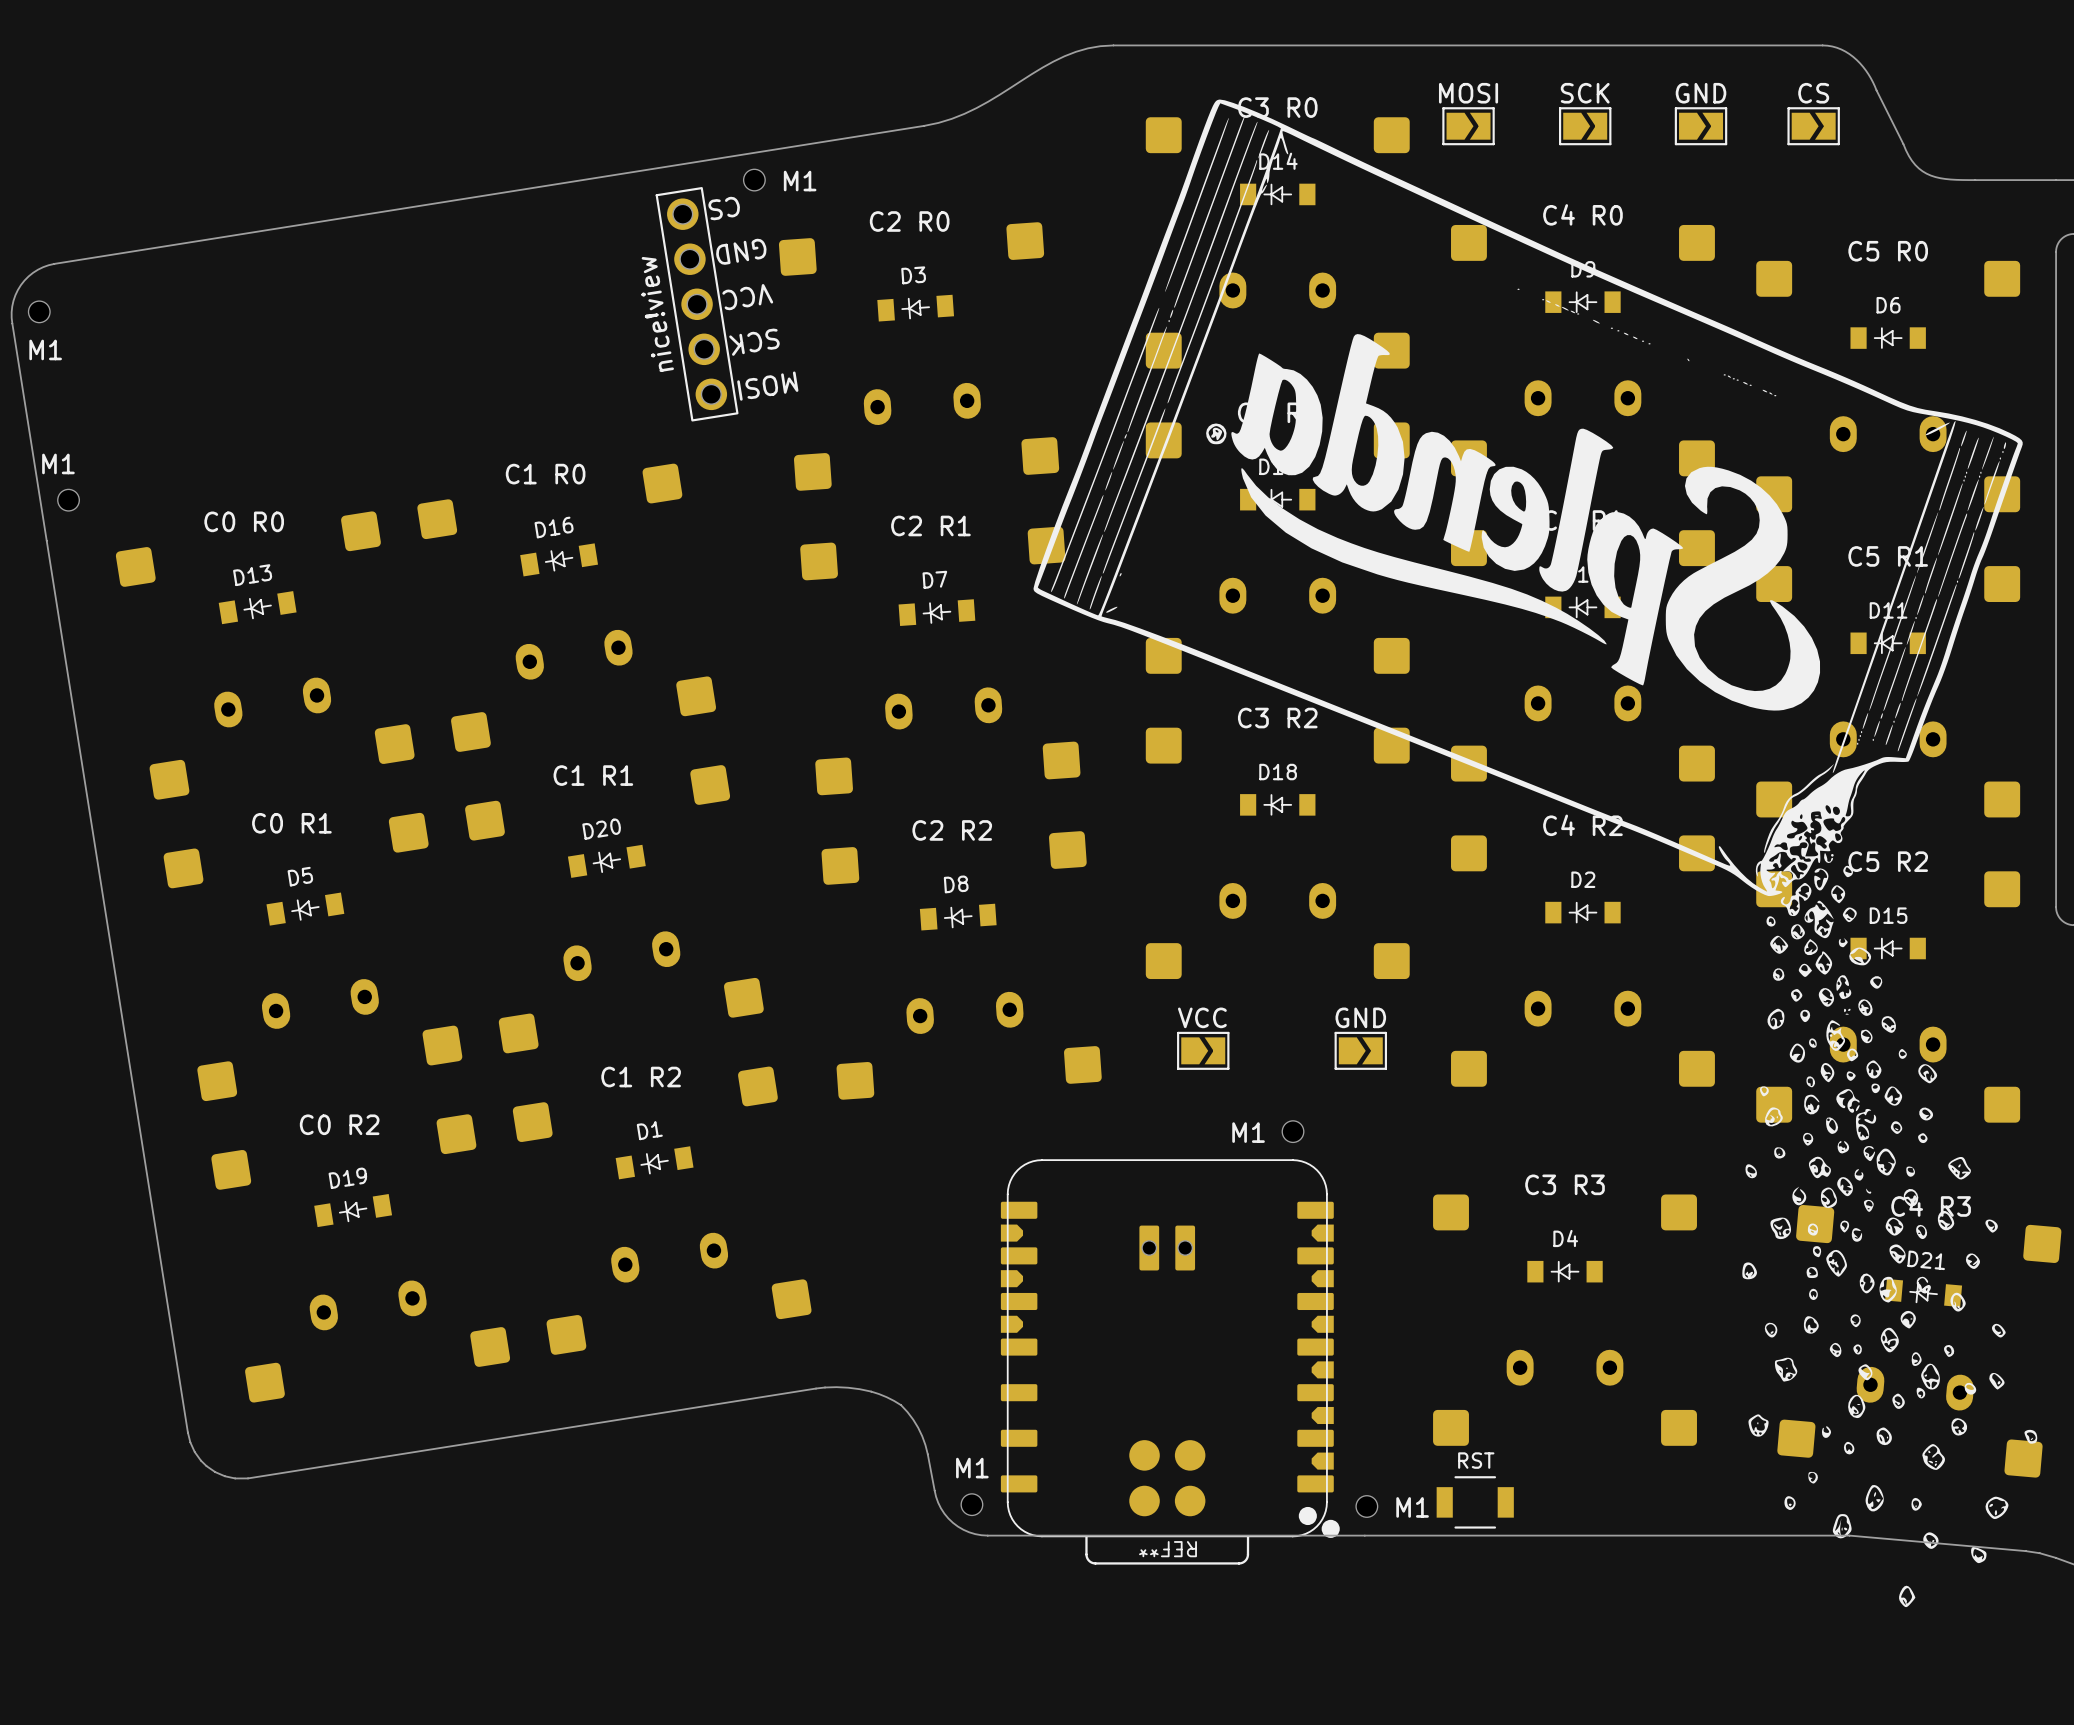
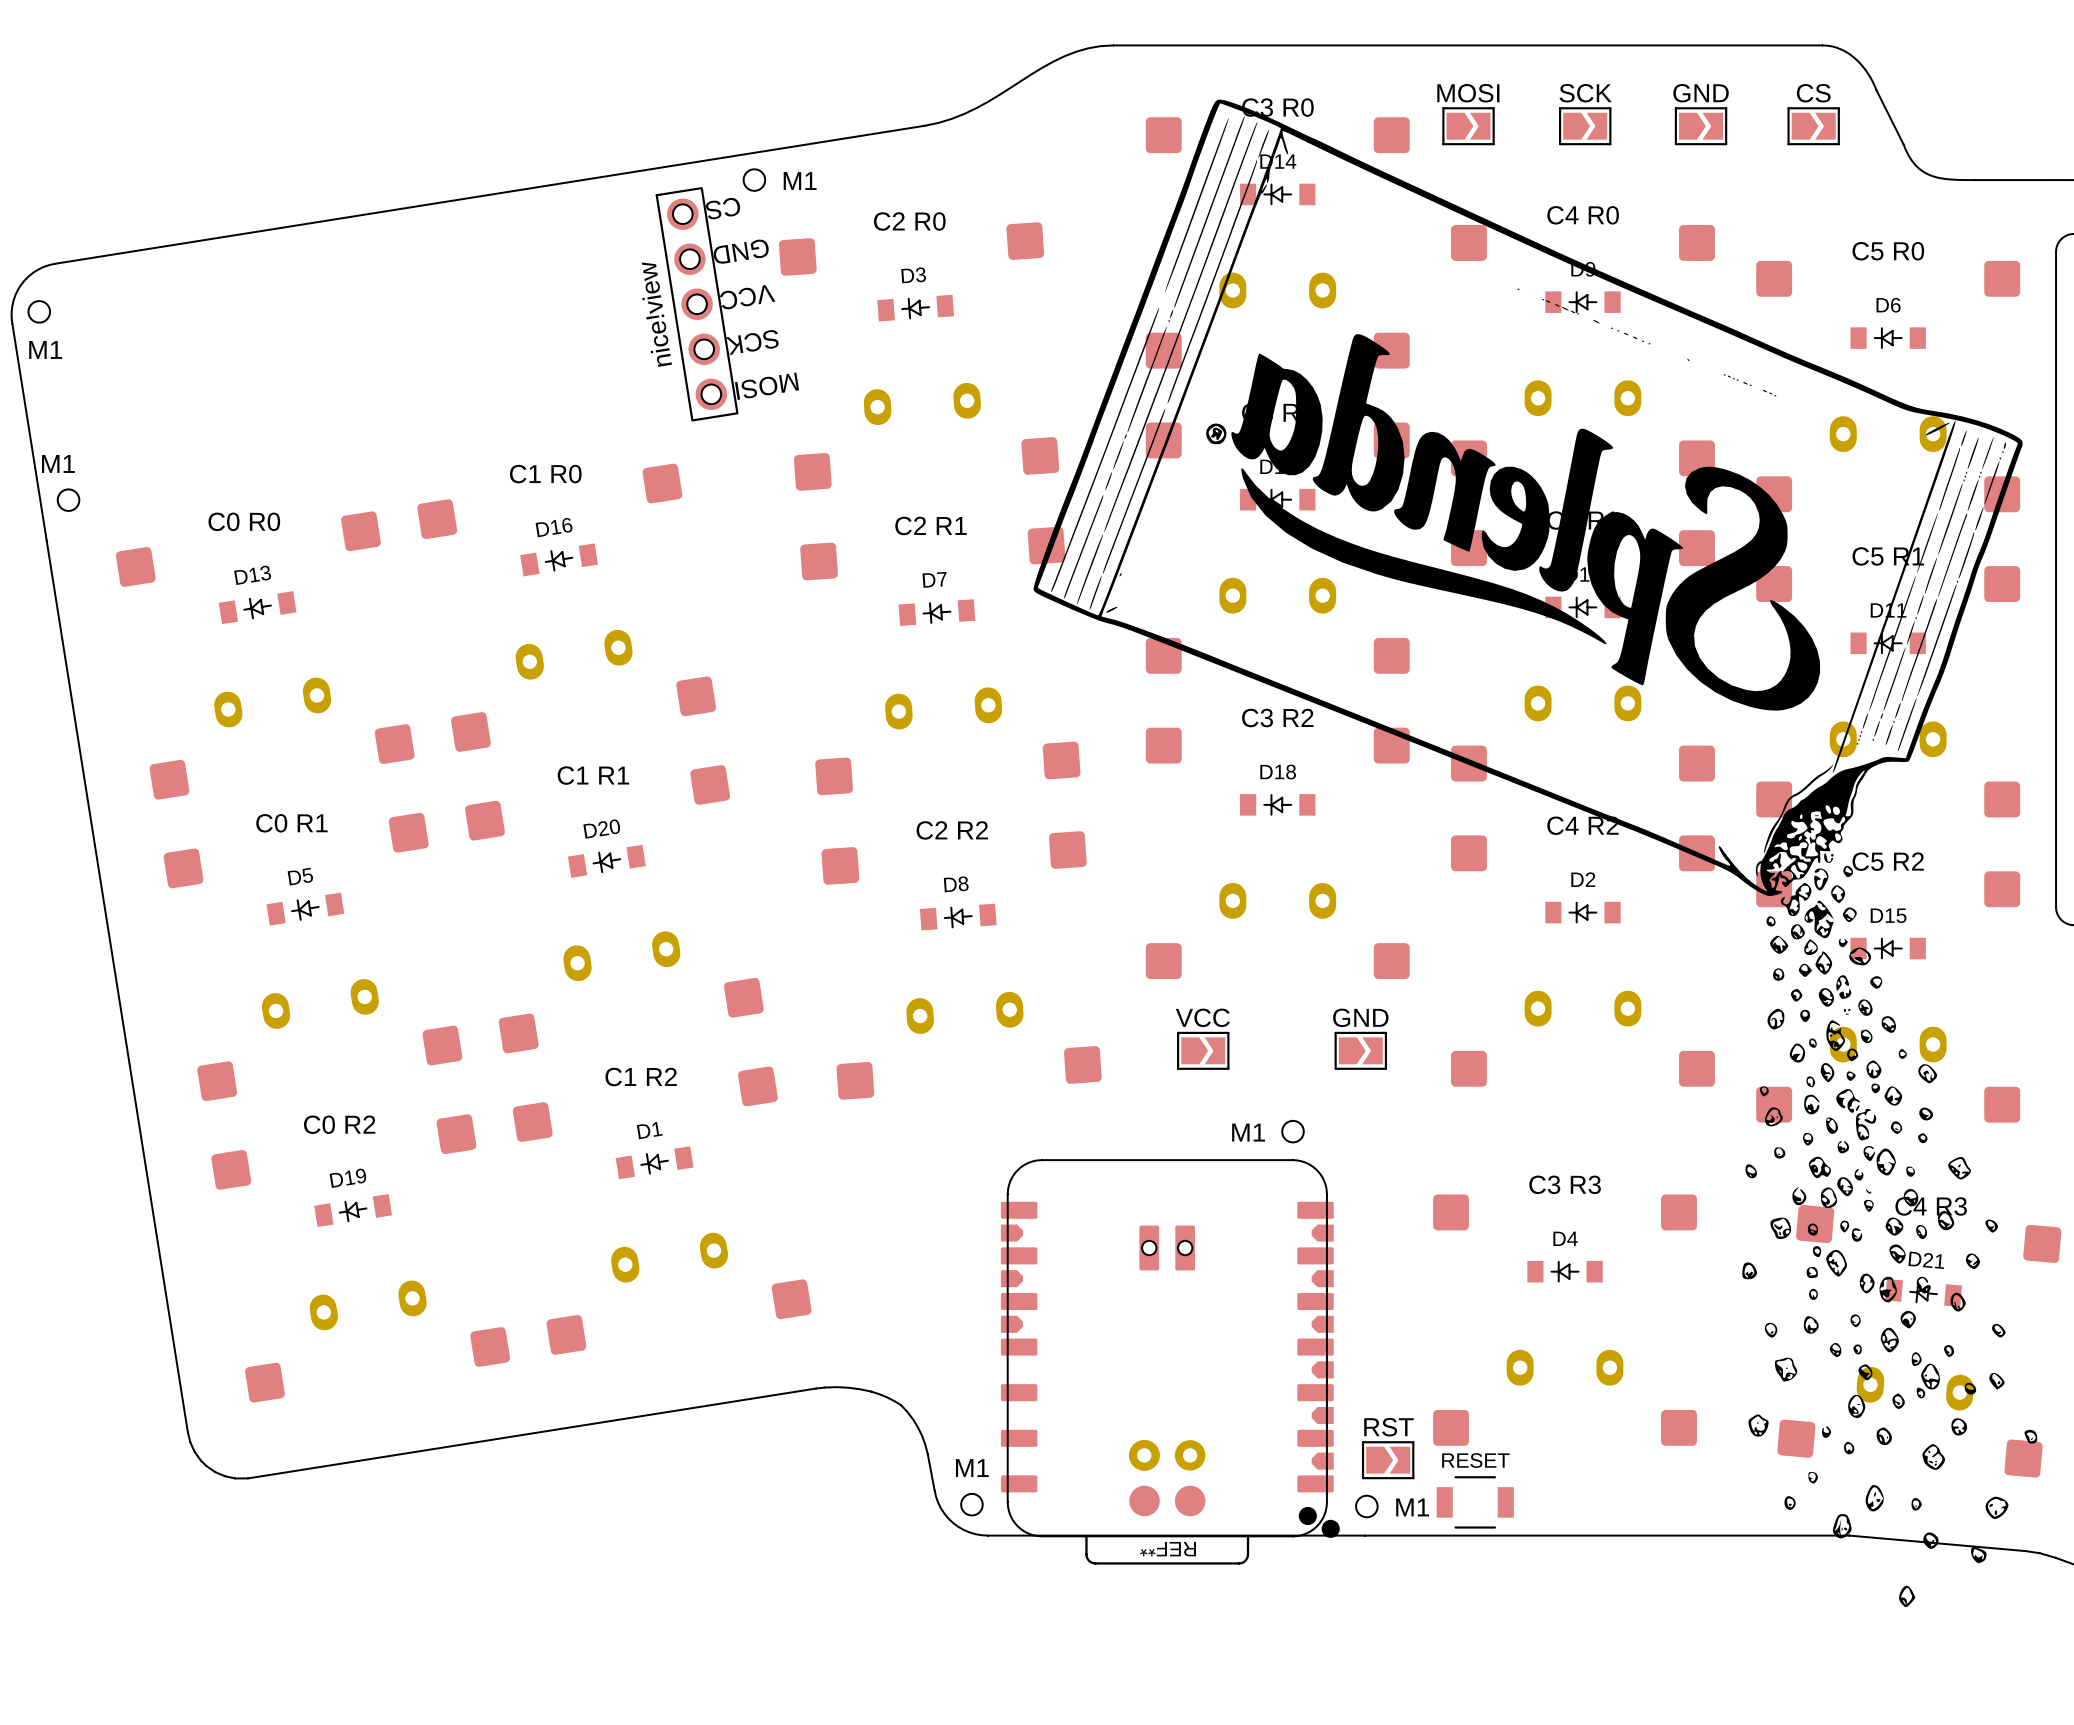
REF** footprint: [1000, 1159, 1340, 1565] -> [1000, 1159, 1340, 1565]
part: none -> (1144, 1455)
RST: none -> (1388, 1460)
RST name: RST (1476, 1460) -> RESET (1475, 1460)

